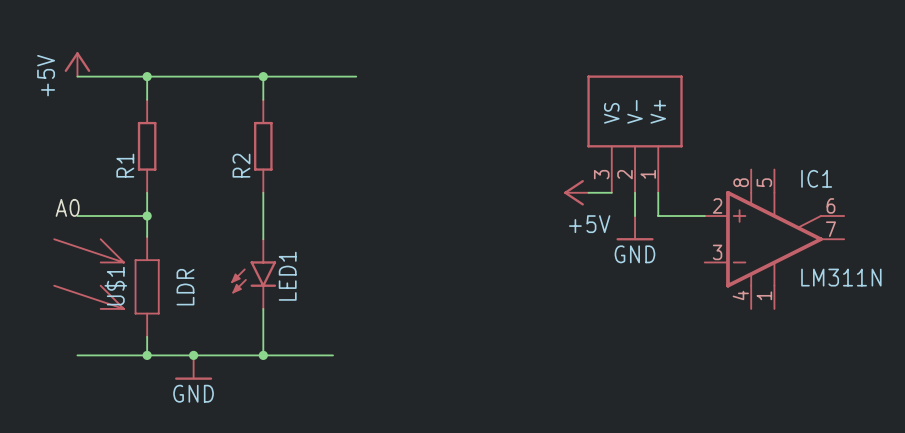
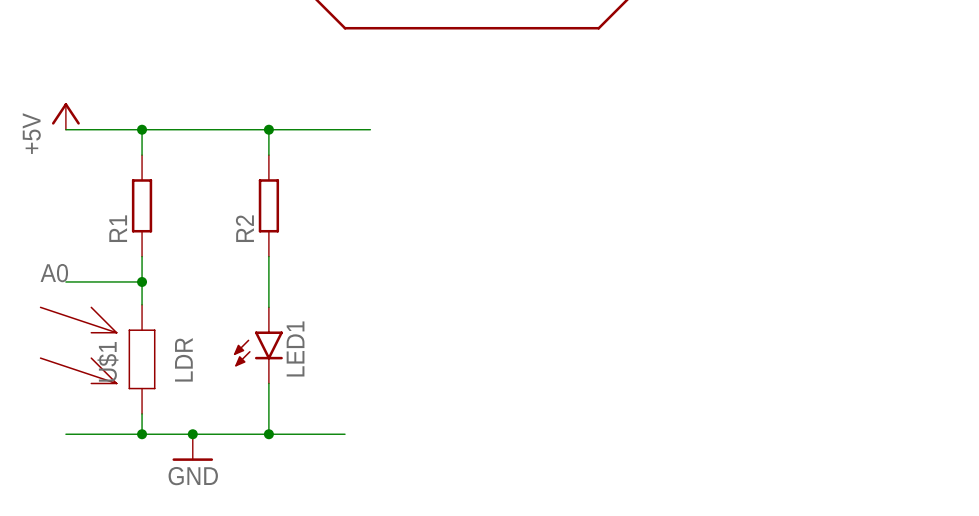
part: (635, 134) -> none
power symbol: +5V (576, 192) -> none
wire: (588, 192) (611, 192) -> none
wire: (635, 192) (635, 216) -> none
wire: (658, 192) (658, 216) (704, 216) -> none
power symbol: GND (635, 228) -> none
IC1: LM311N (774, 239) -> none

